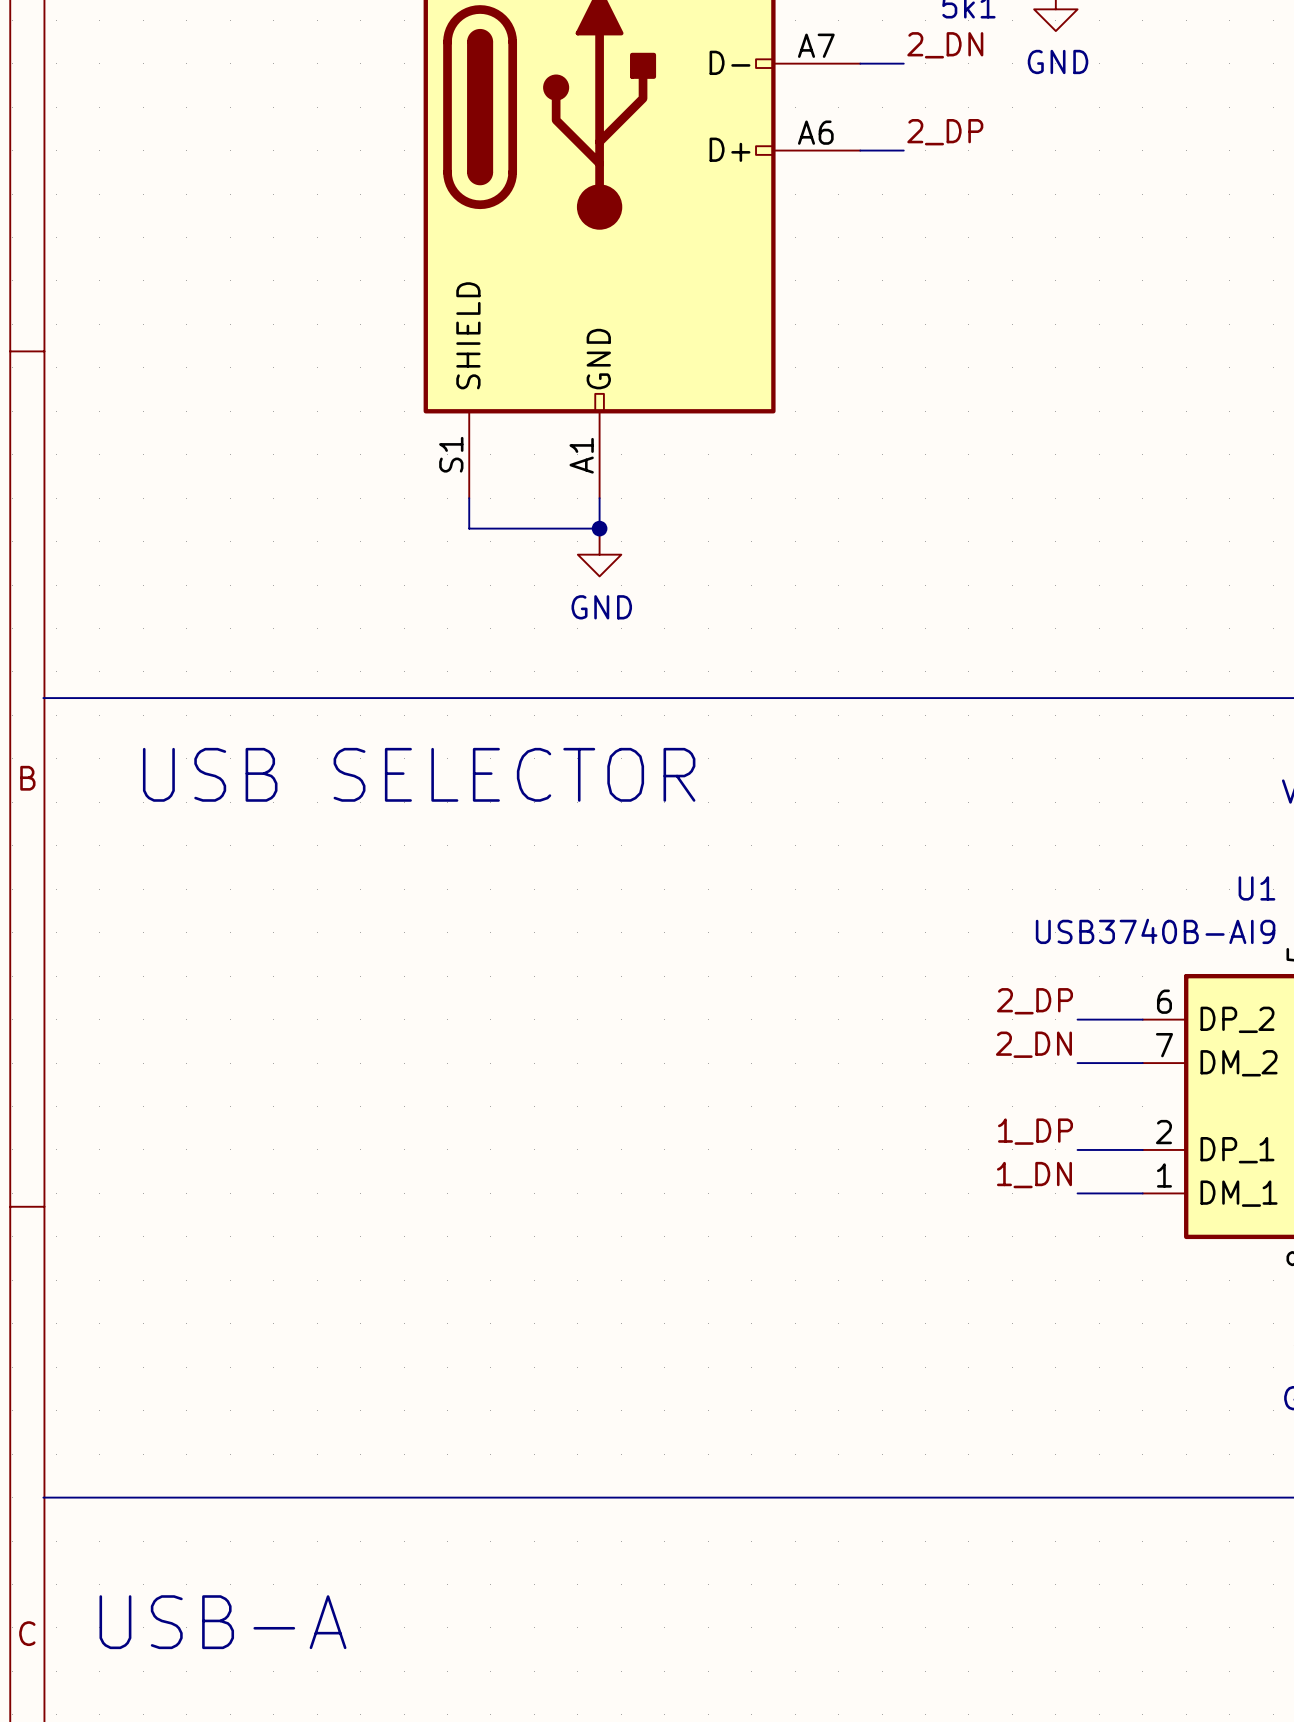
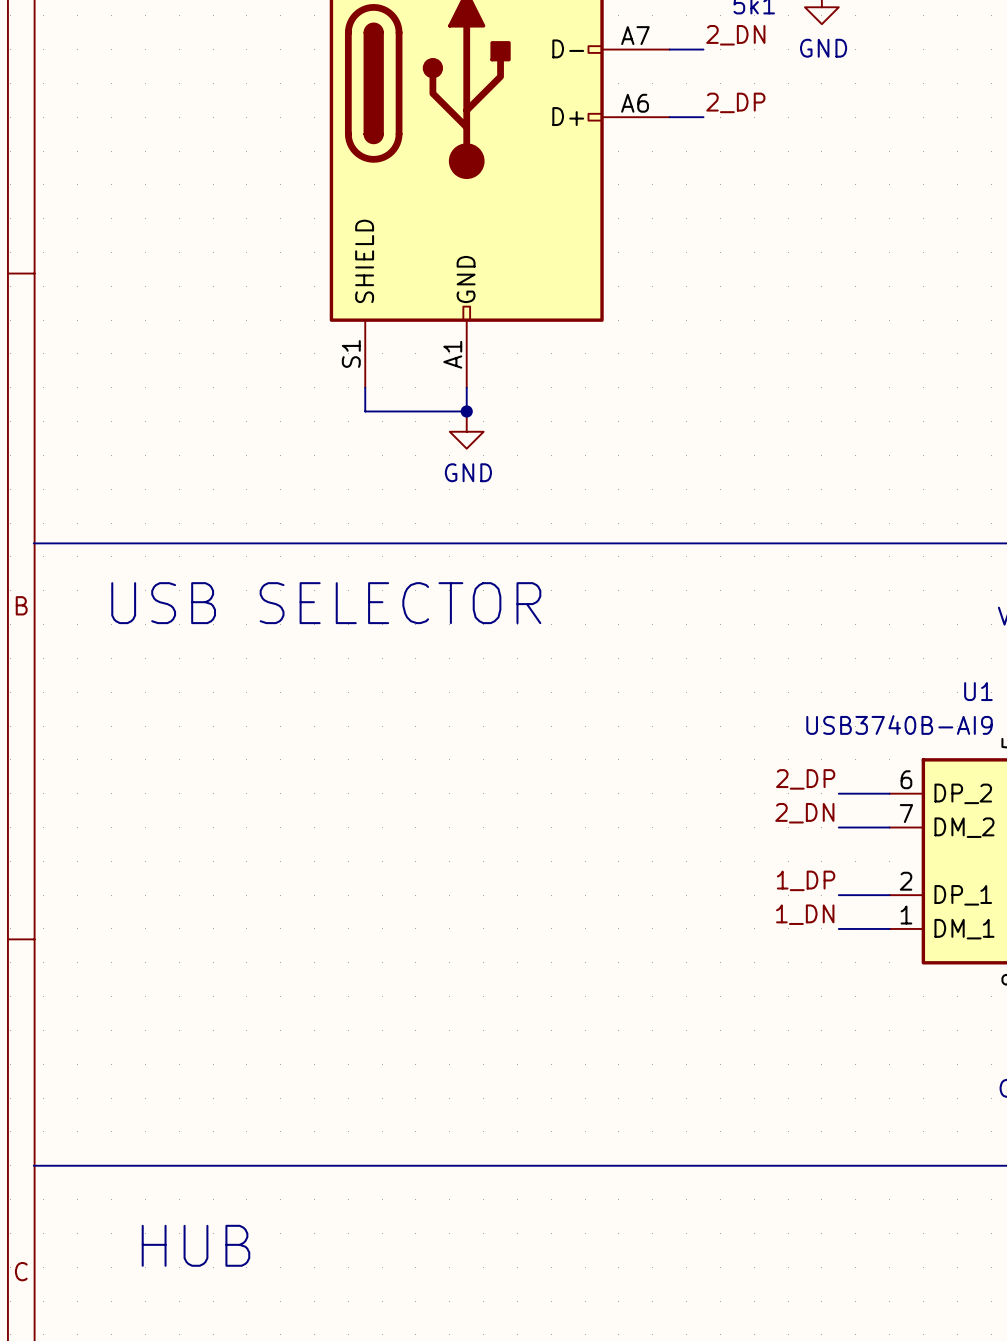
text: none -> HUB (195, 1245)
text: USB-A (222, 1622) -> none

